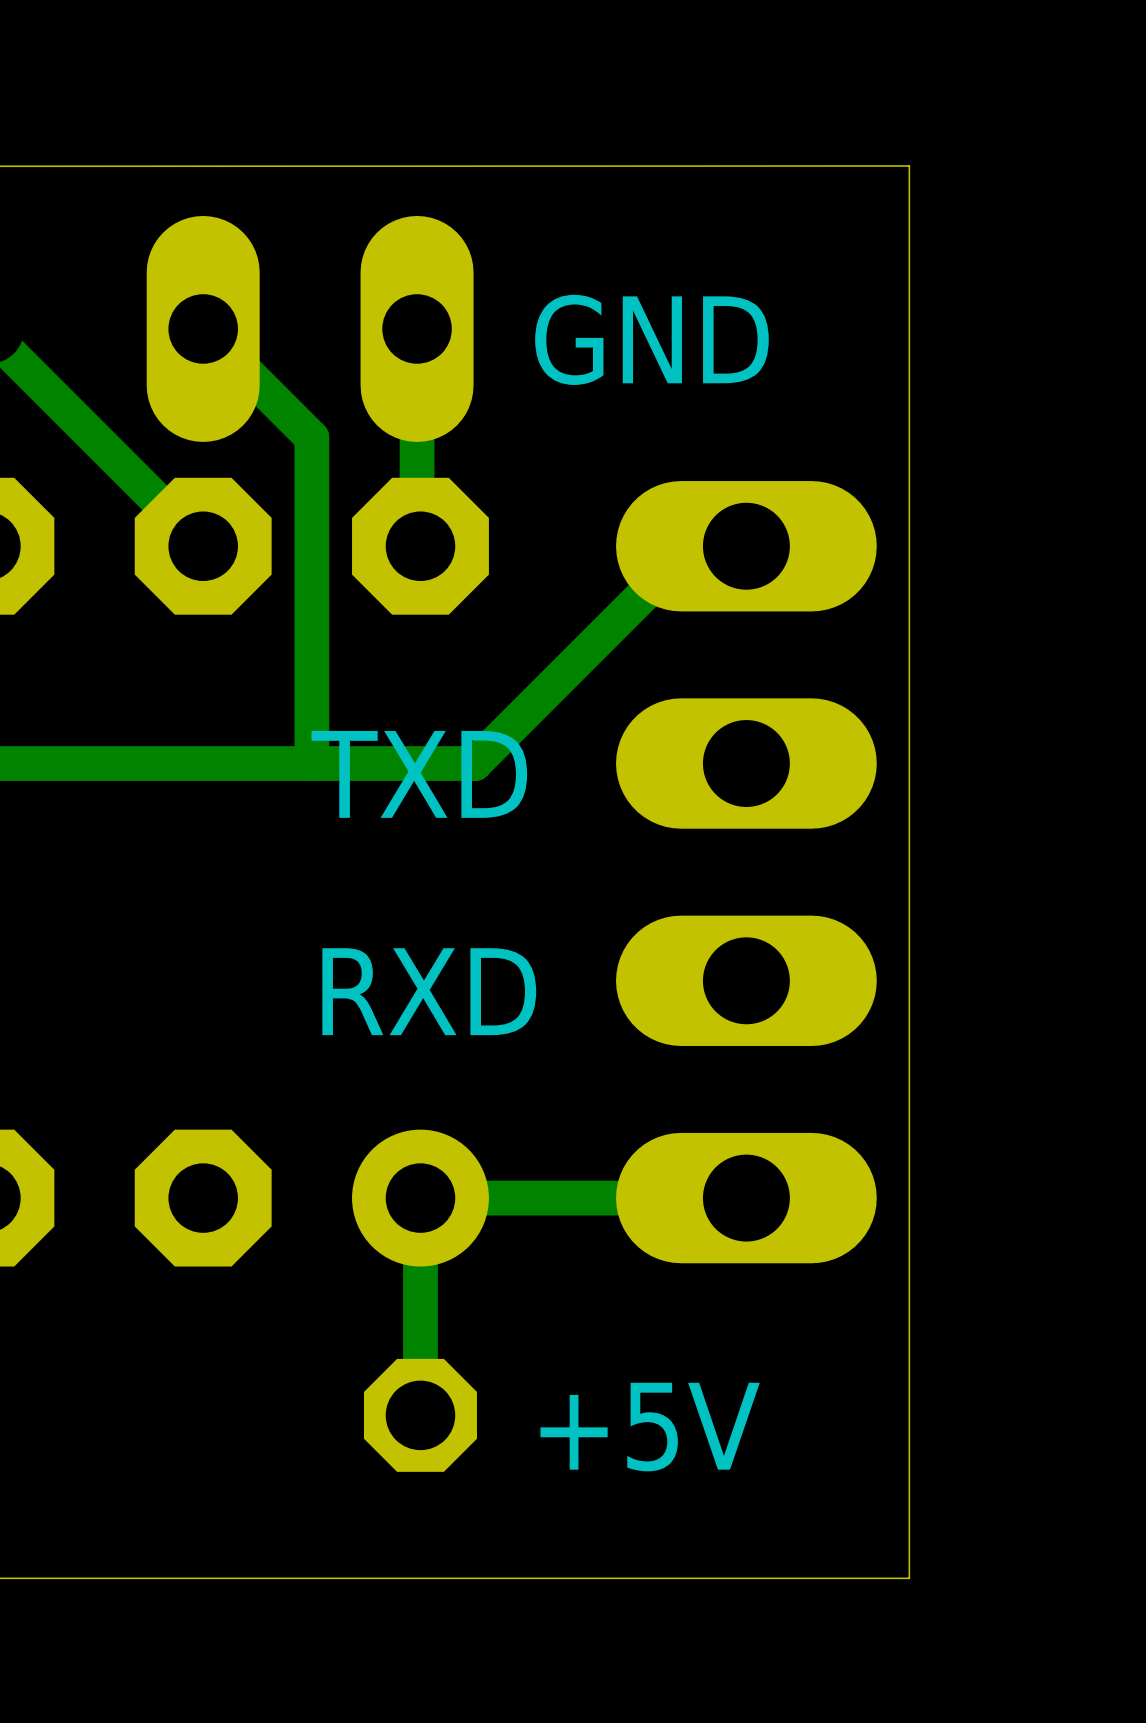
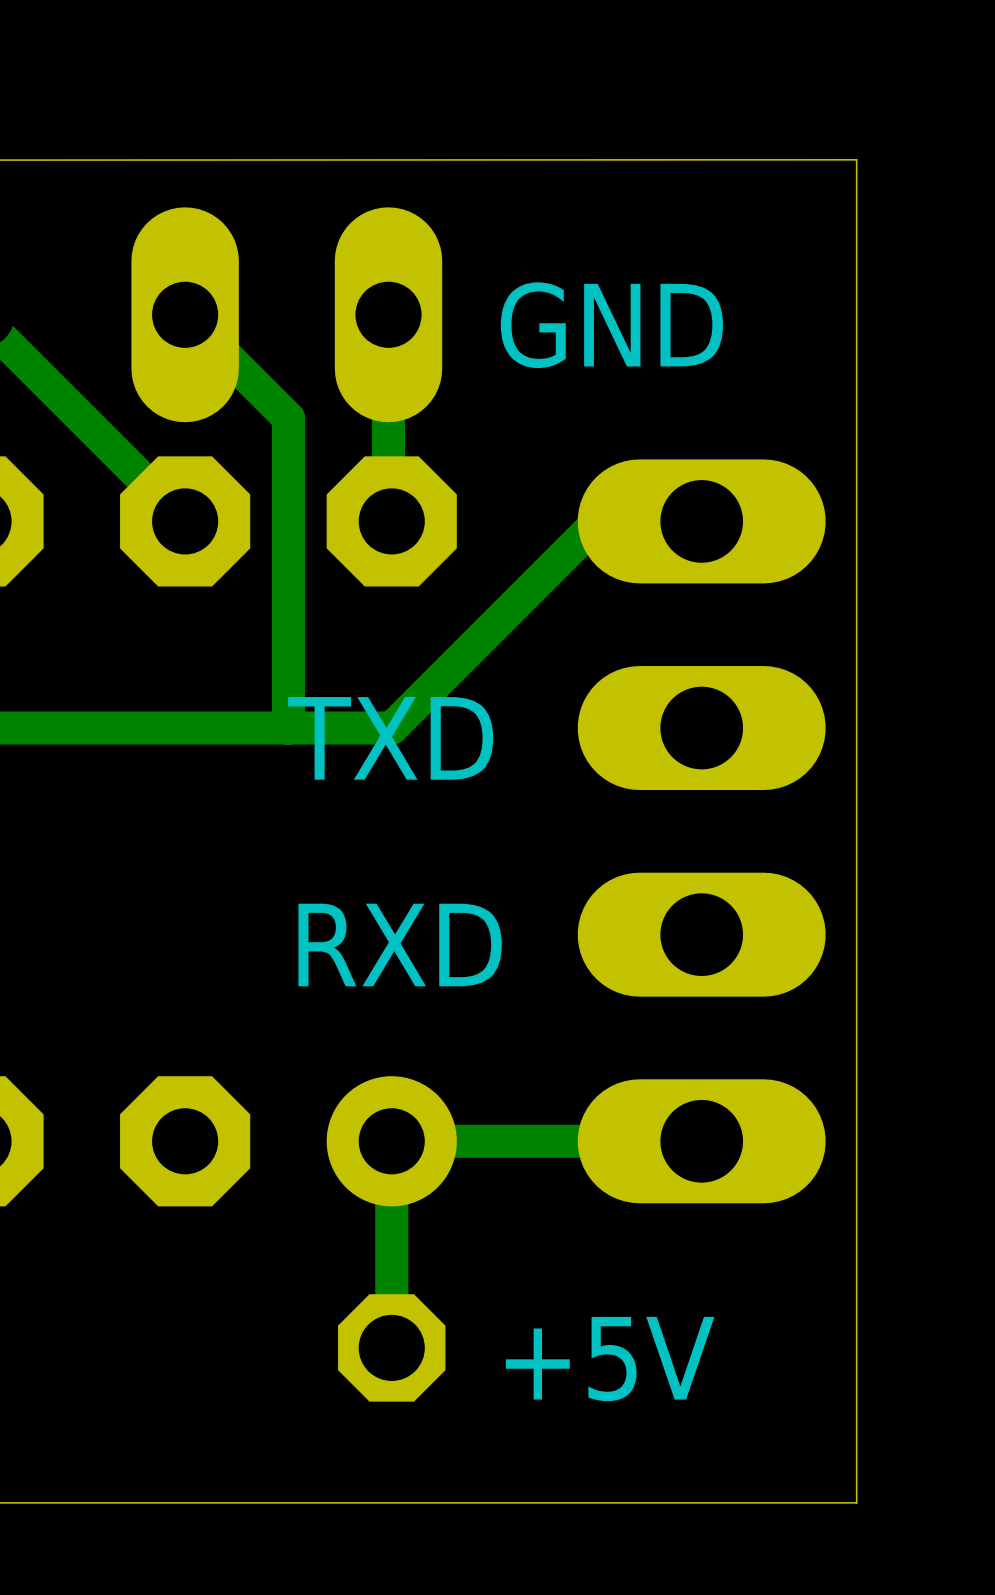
track: (692, 546) (474, 763) (420, 763) -> (650, 521) (598, 521) (391, 728)

